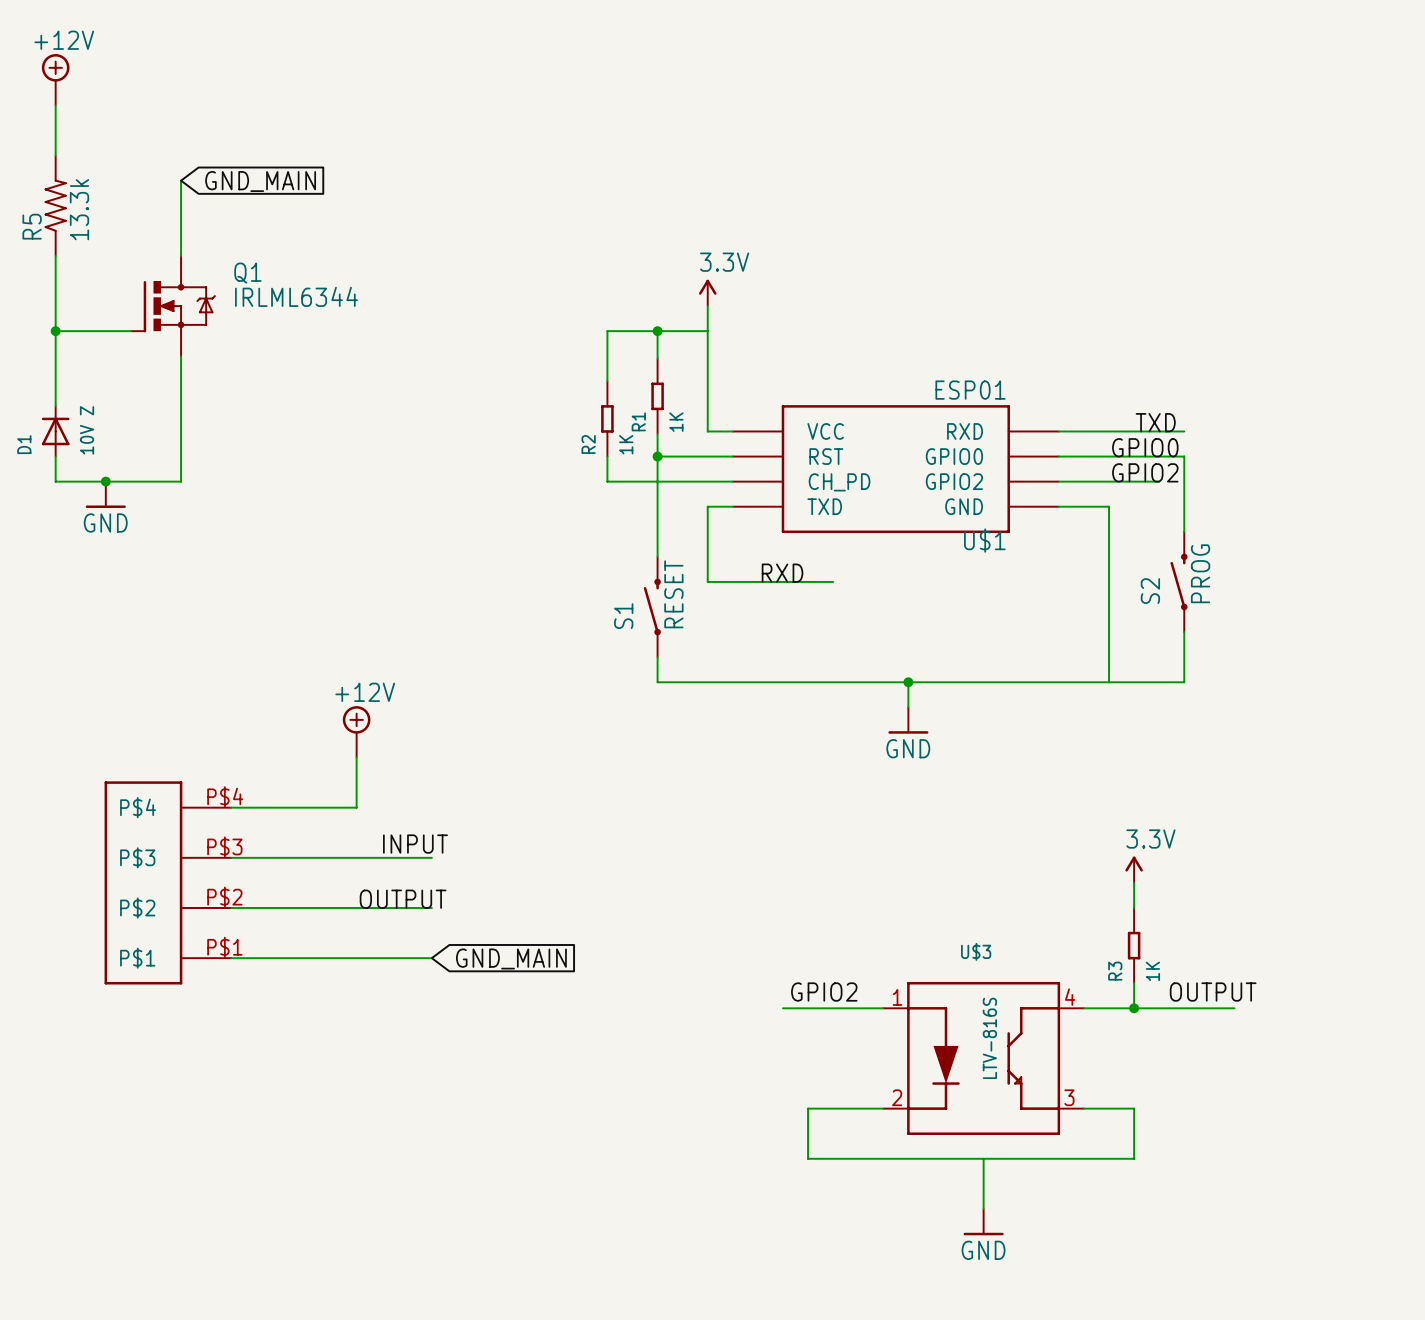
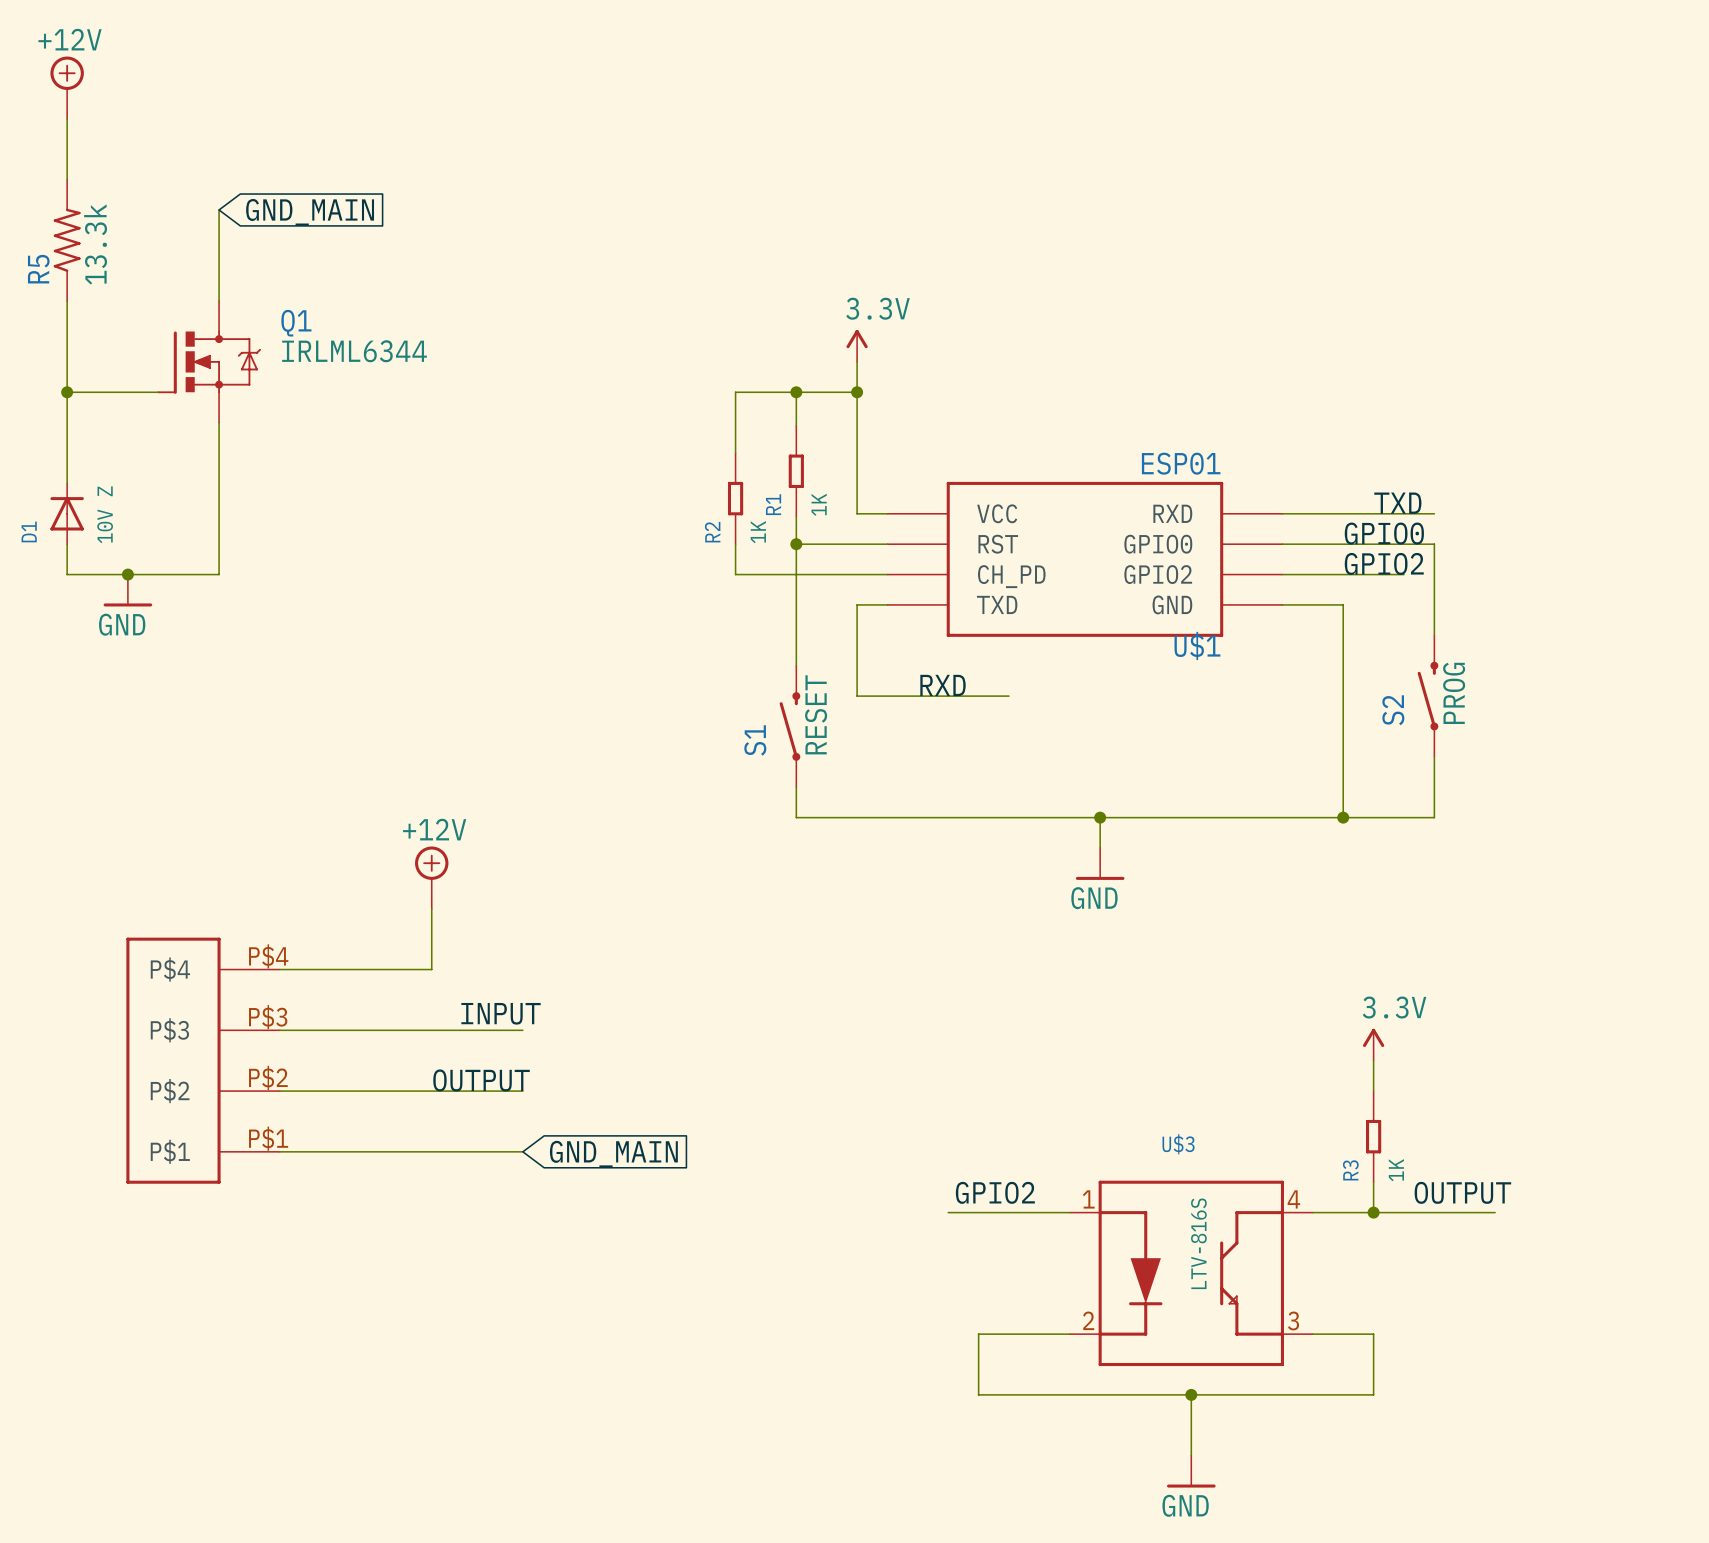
junction: none -> (857, 392)
junction: none -> (1343, 817)
junction: none -> (1191, 1394)

